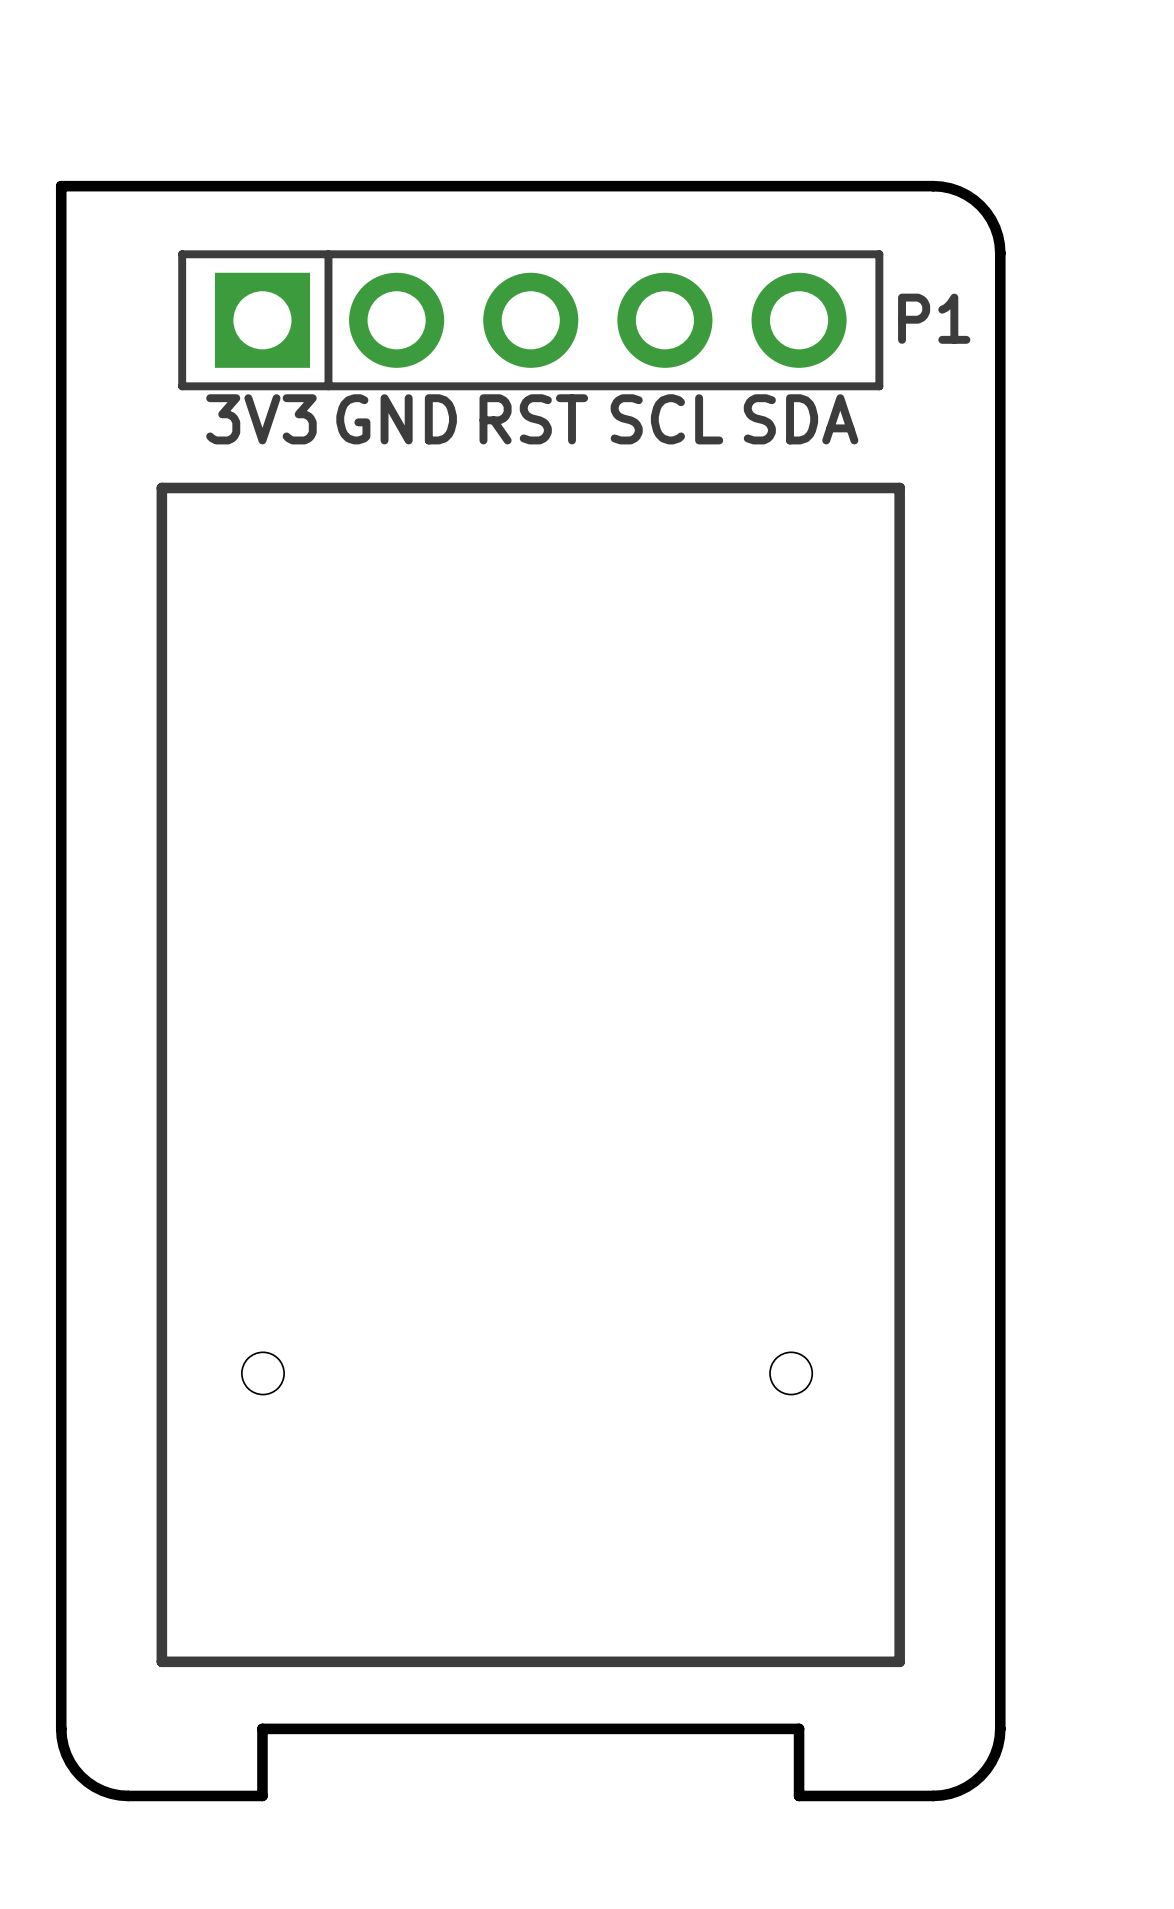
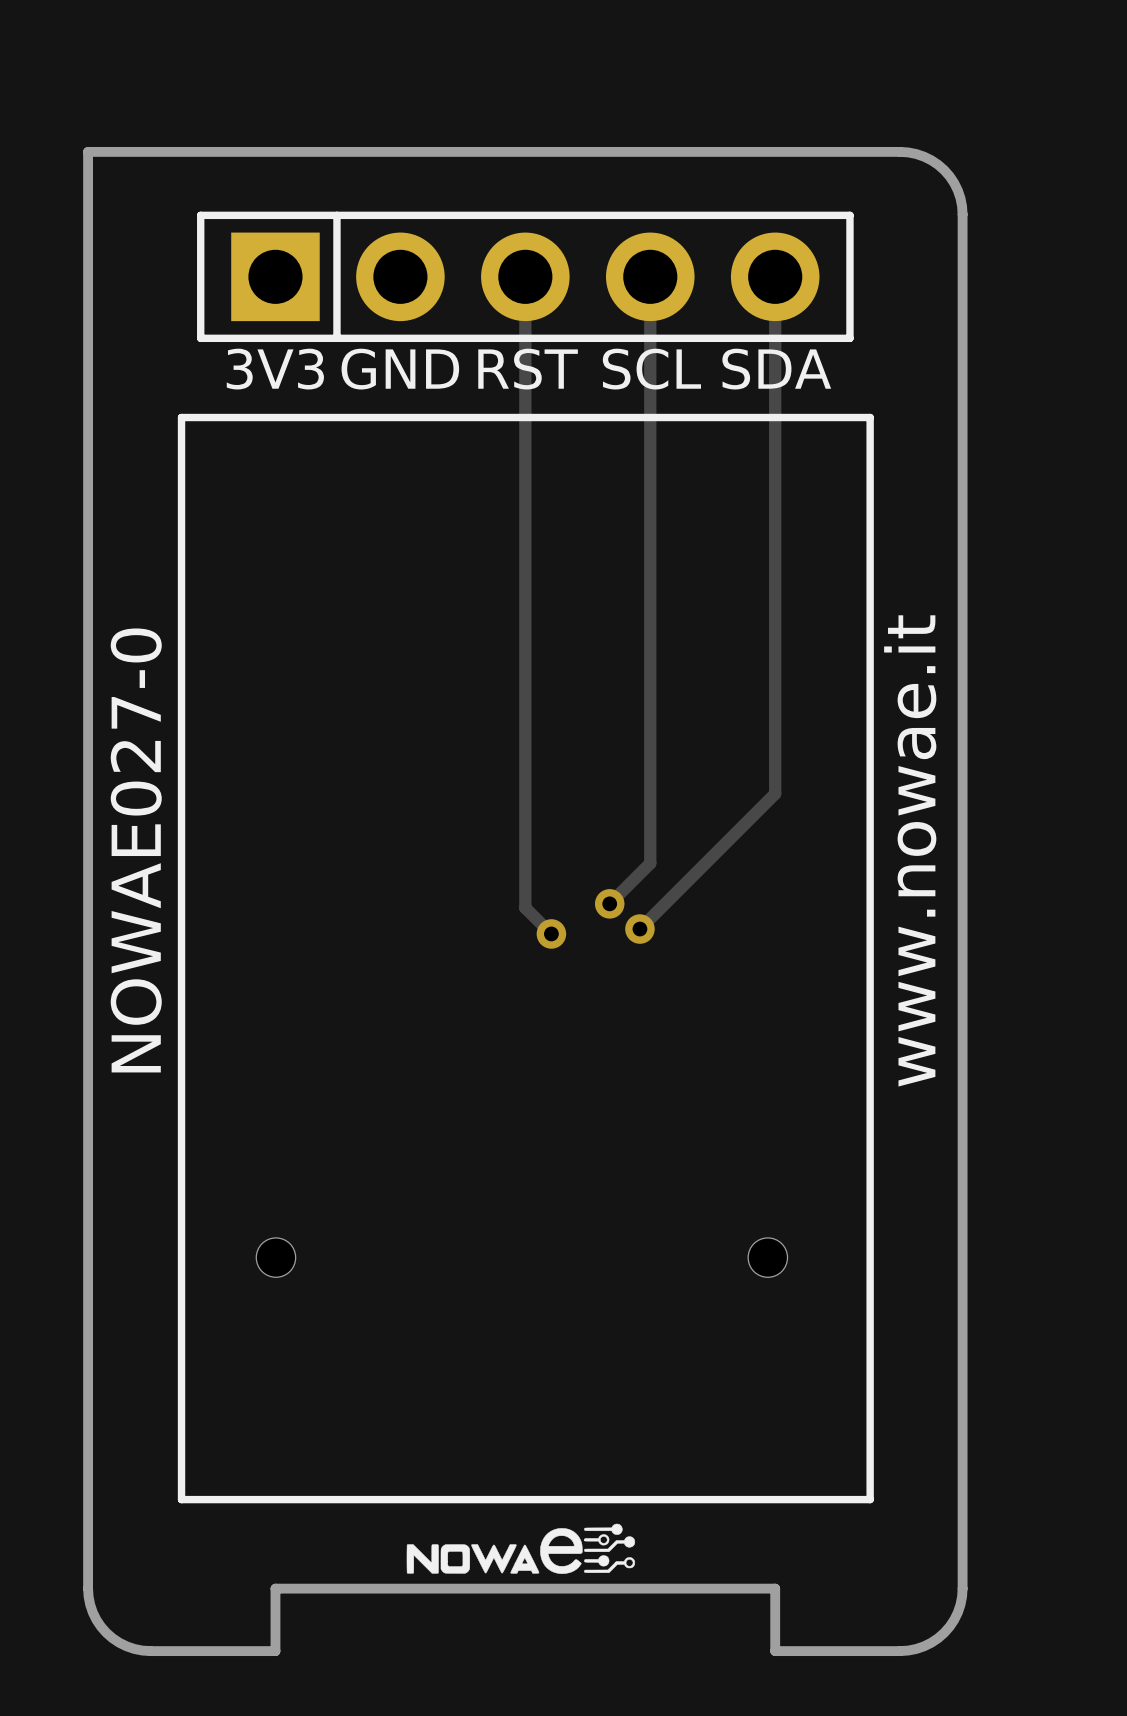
P1 name: P1 (934, 318) -> none
track: none -> (525, 276) (525, 907) (551, 933)
track: none -> (650, 276) (650, 863) (609, 903)
track: none -> (775, 276) (775, 793) (639, 929)
drawing: none -> [177, 413, 874, 1574]
line: (161, 487) (899, 487) (899, 1661) (161, 1661) (161, 487) -> none
text: none -> NOWAE027-0 (136, 850)
text: none -> www.nowae.it (910, 850)
via: none -> (609, 903)
via: none -> (639, 929)
via: none -> (551, 933)

